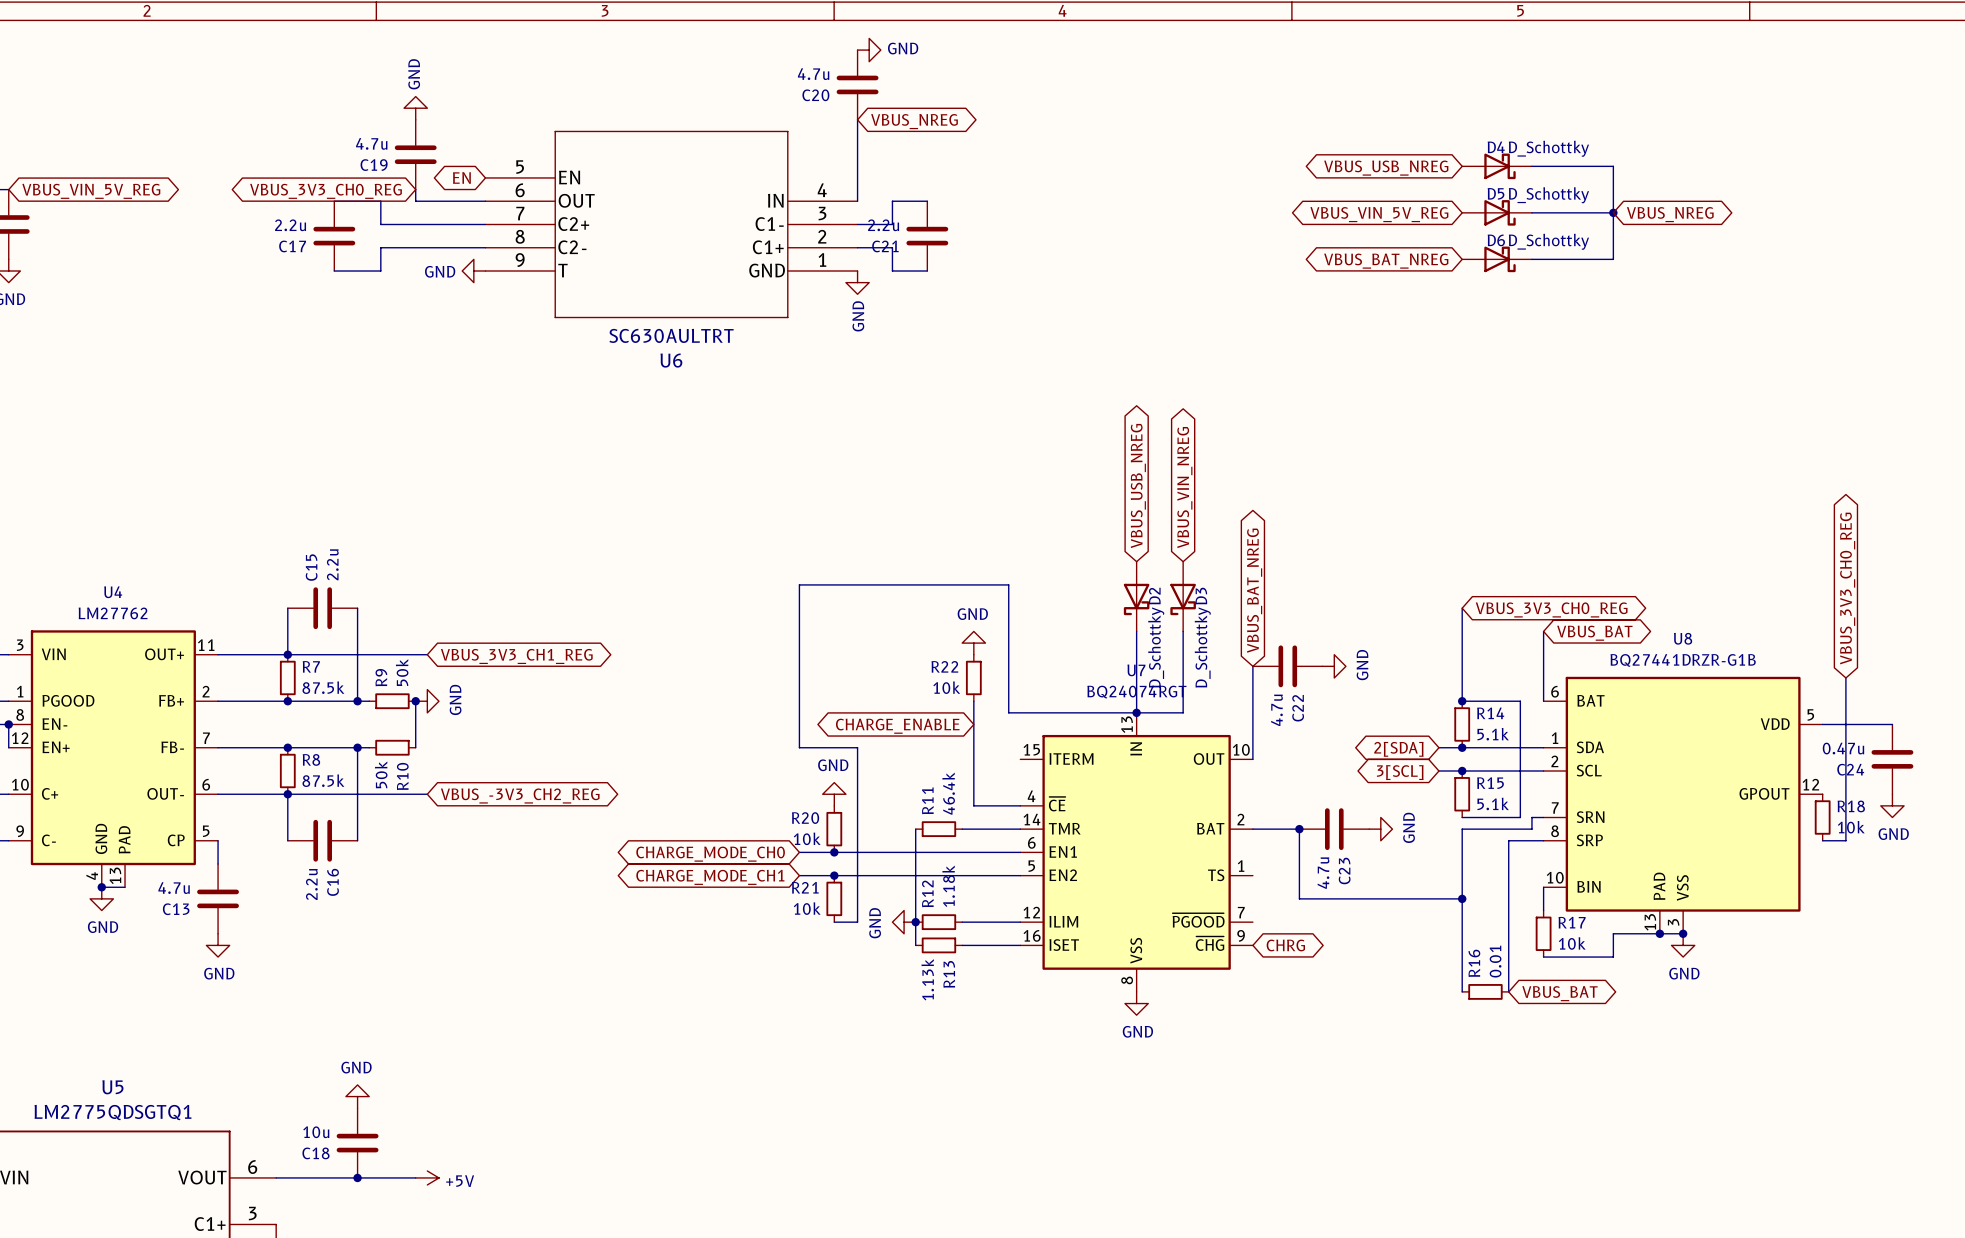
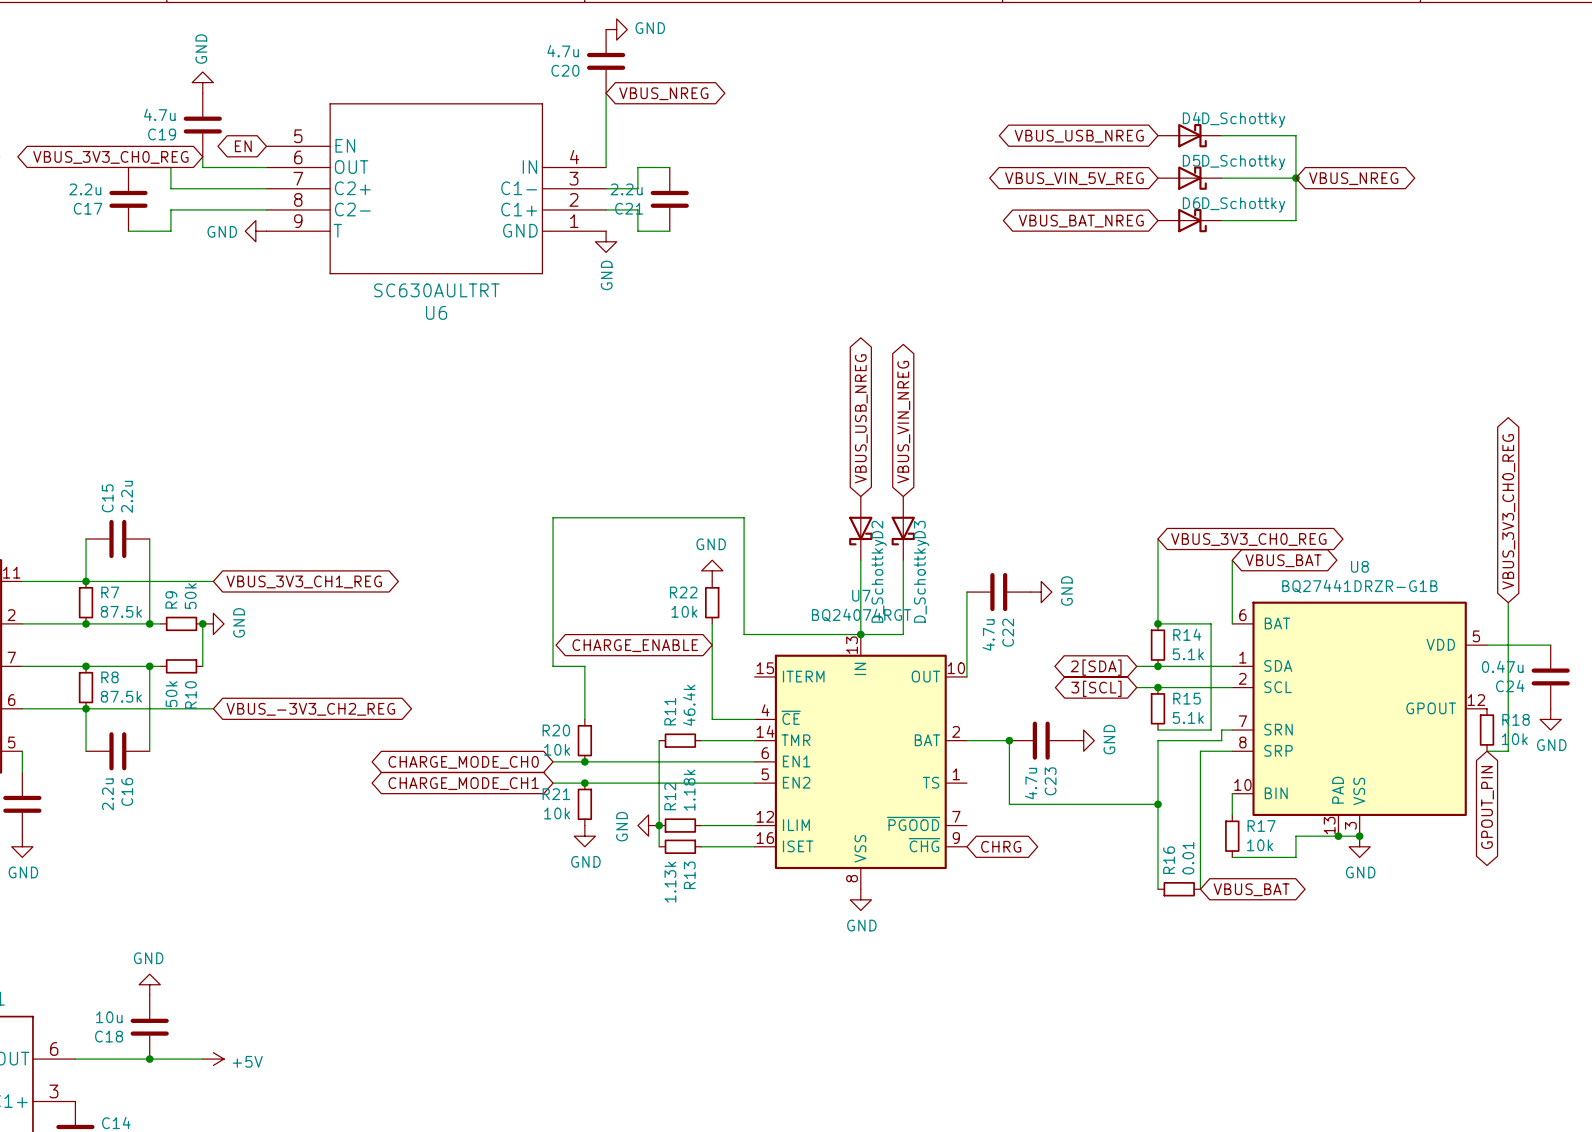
global label: VBUS_BAT_NREG (1254, 590) -> none
wire: (834, 747) (857, 747) (857, 922) (834, 922) -> (584, 666) (584, 719)
power symbol rotation: 0° (834, 794) -> 180° (584, 836)
power symbol position: GND (834, 794) -> GND (584, 836)
global label: none -> GPOUT_PIN (1487, 807)

